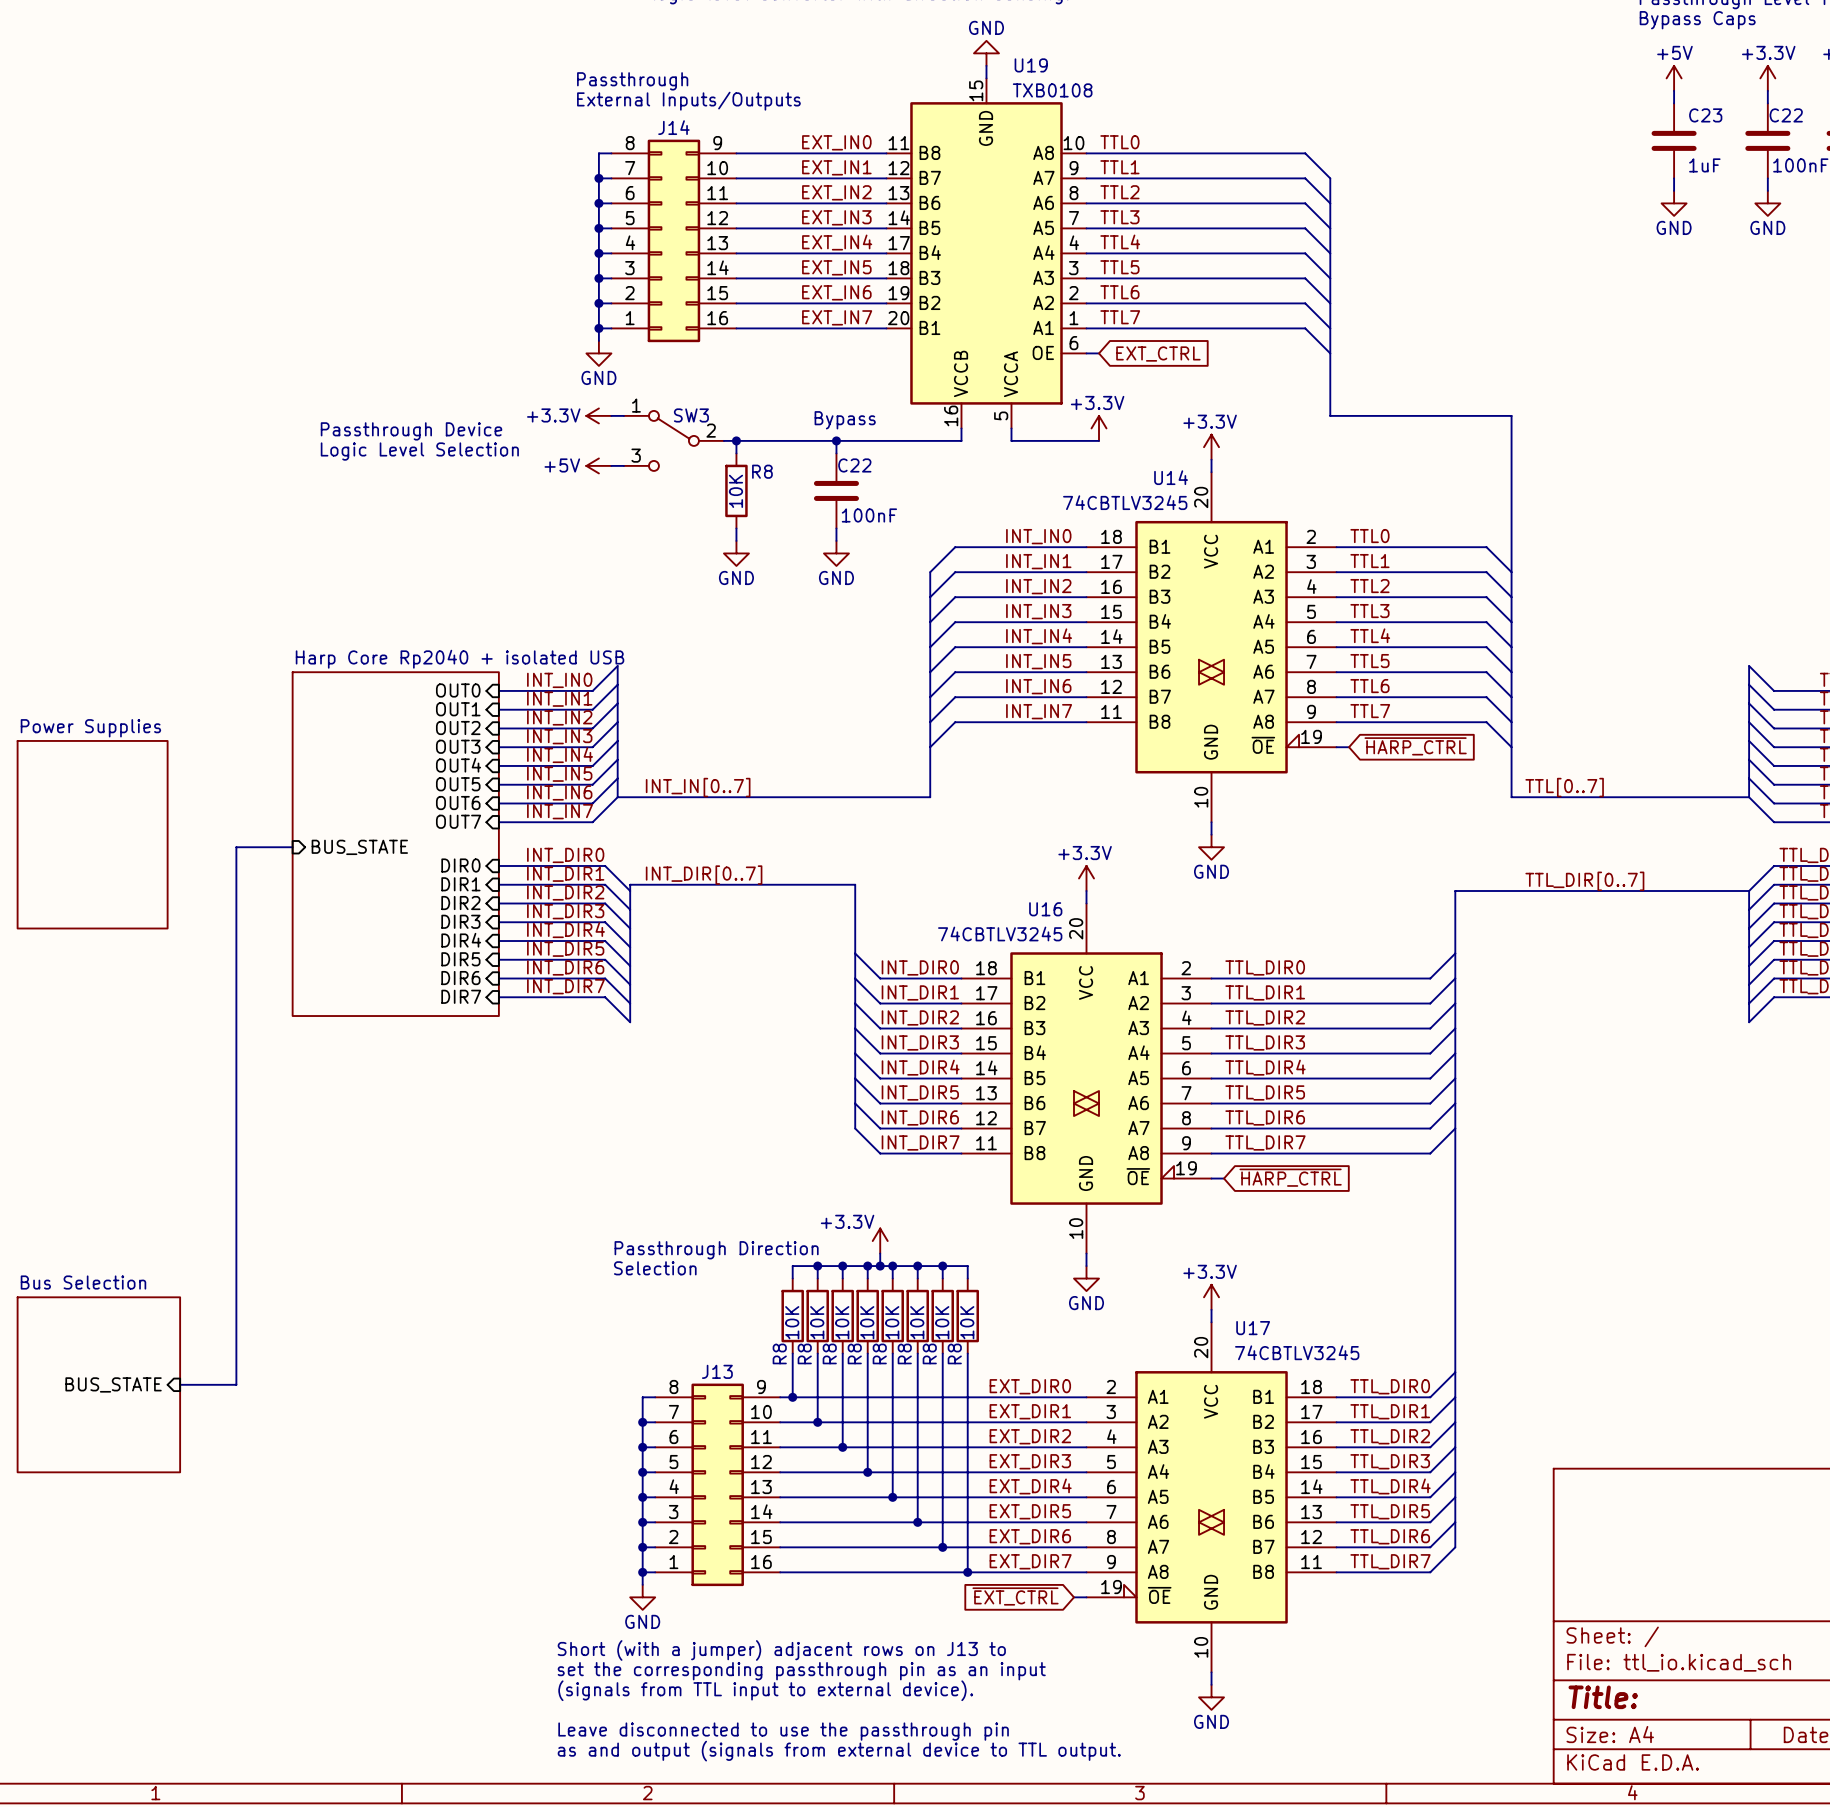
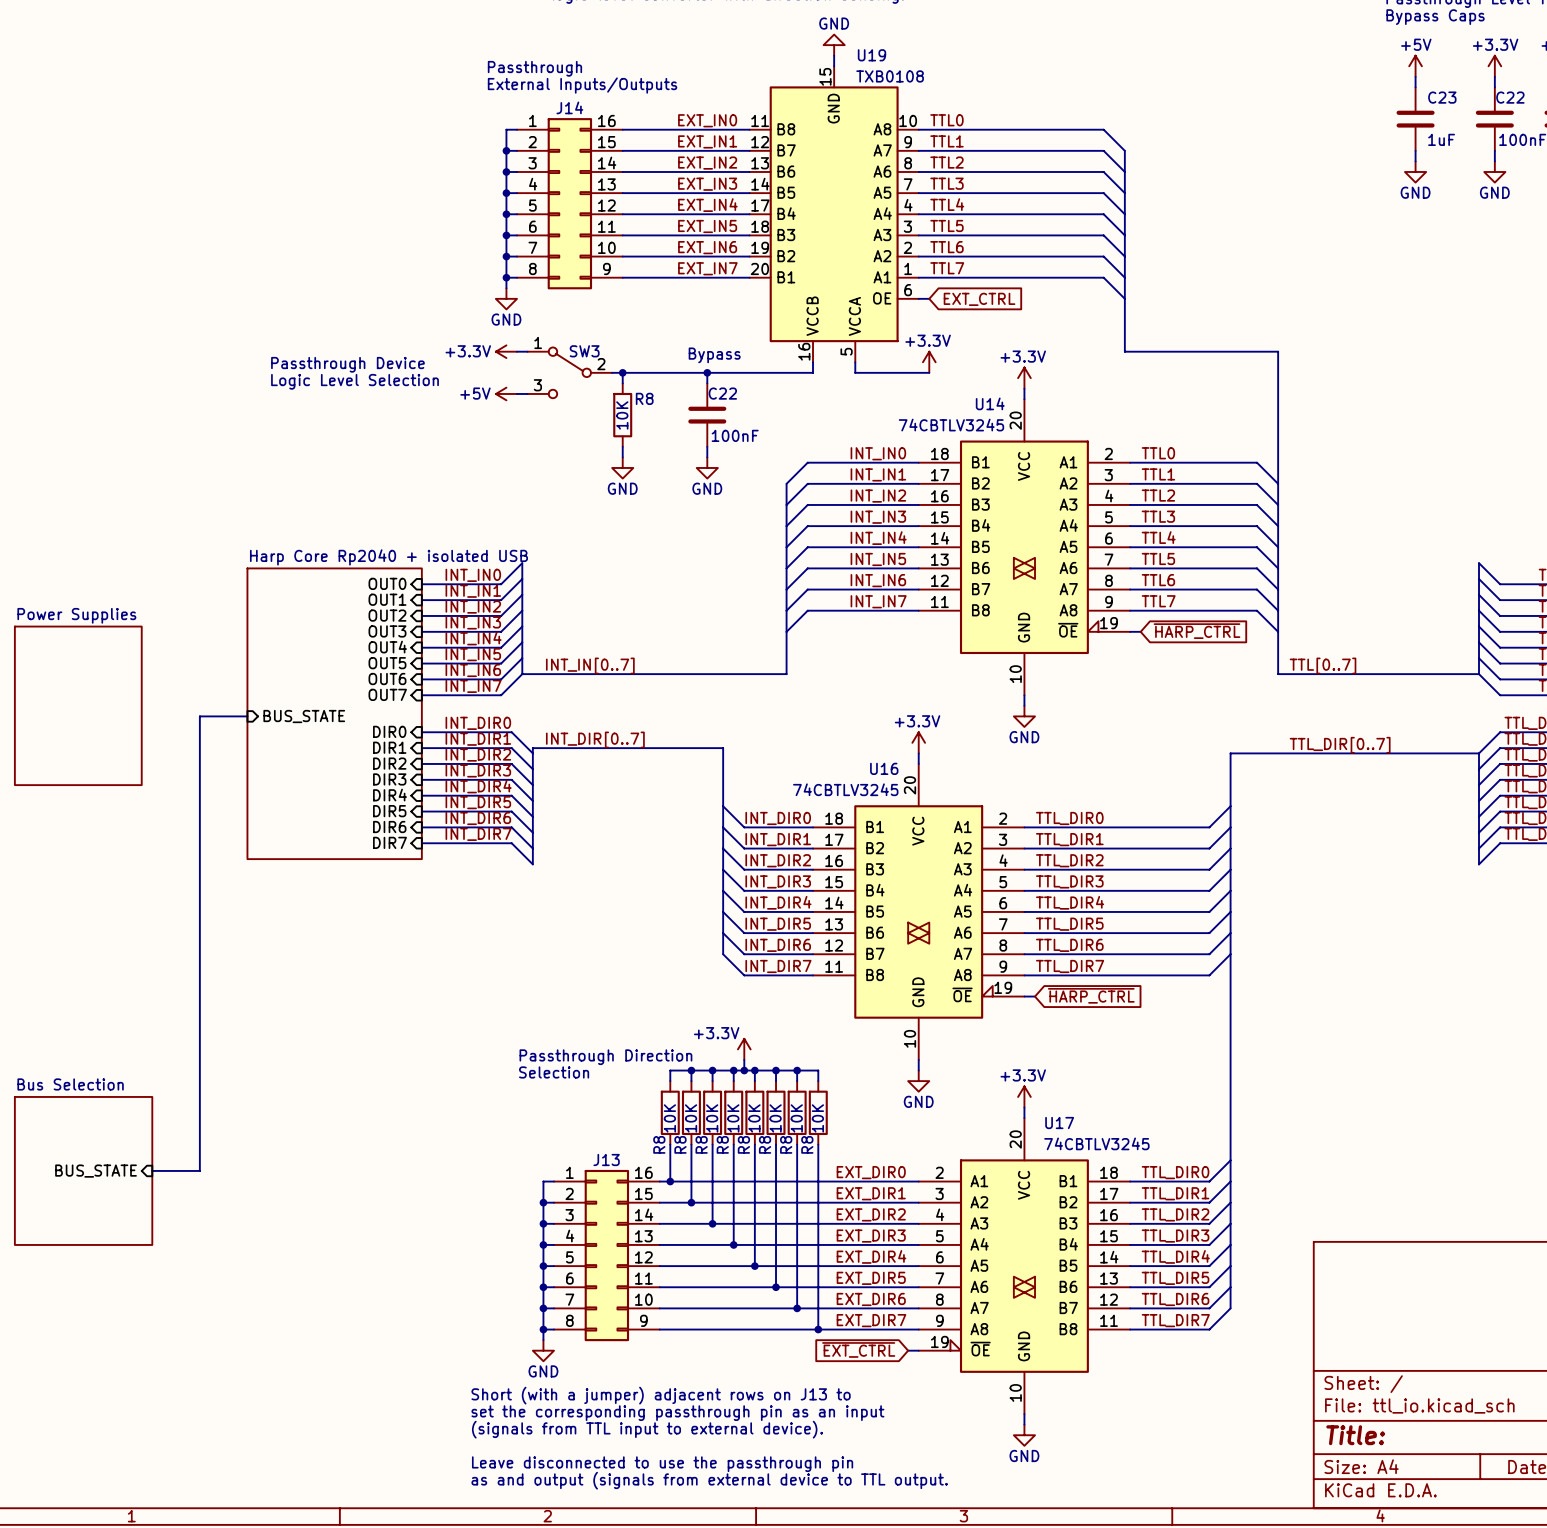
J14 flip: as is (673, 240) -> up-down (569, 203)
J13 flip: as is (717, 1484) -> up-down (606, 1255)

